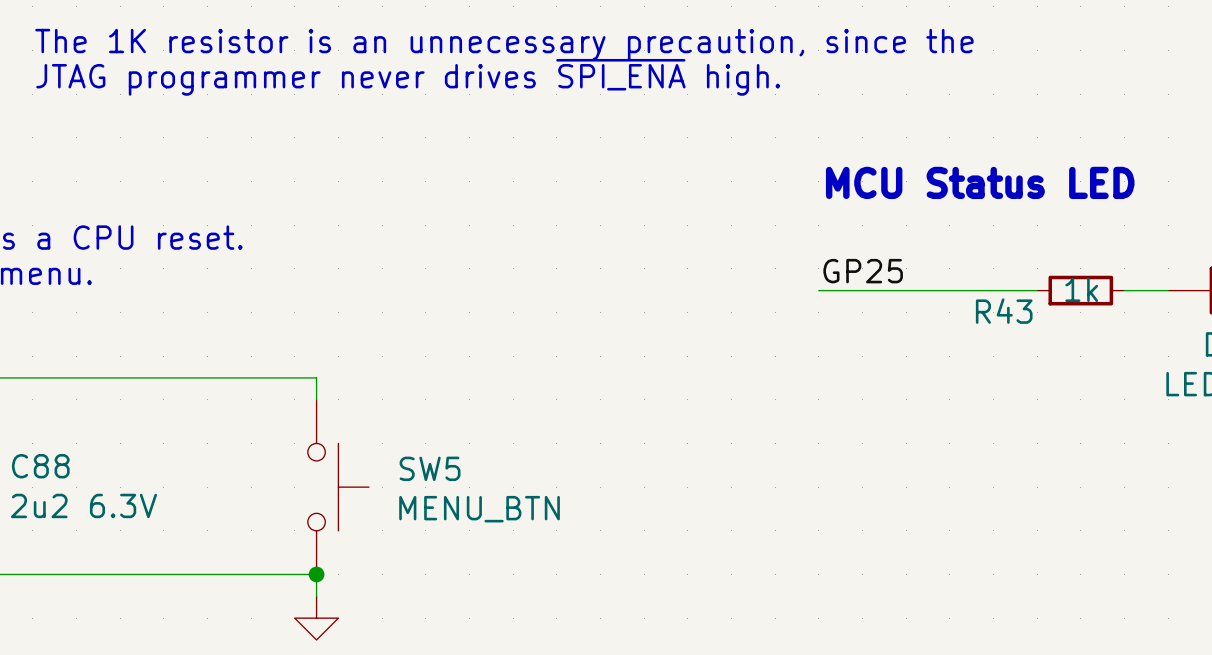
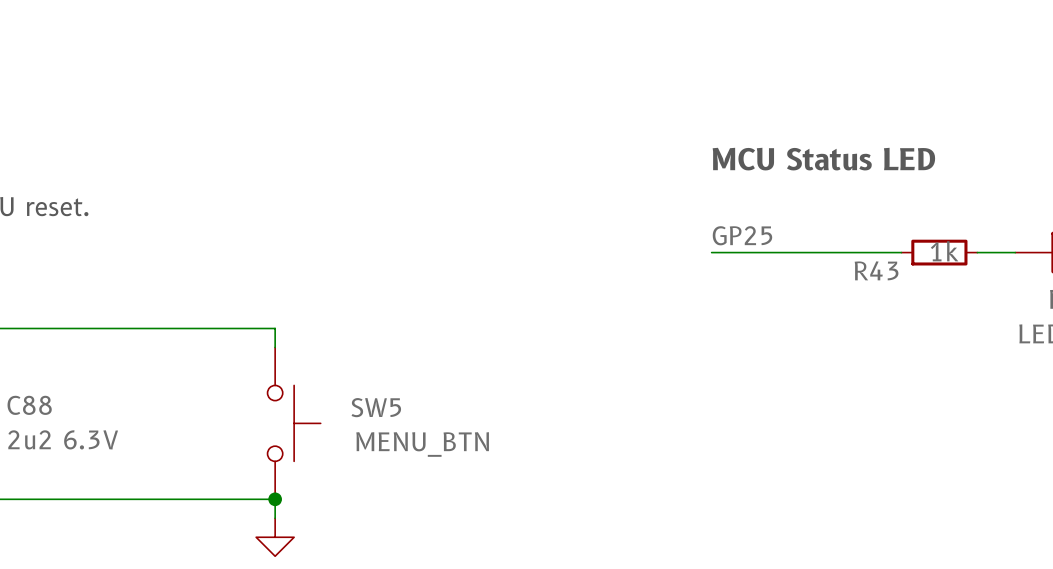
text: The 1K resistor is an unnecessary precaution, since the (504, 44) -> none
text: JTAG programmer never drives ~{SPI_ENA} high. (408, 77) -> none

